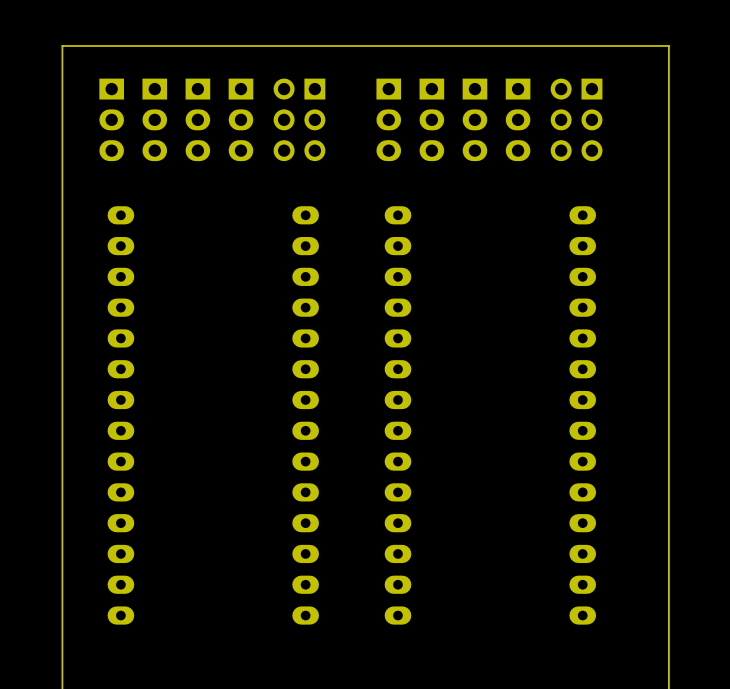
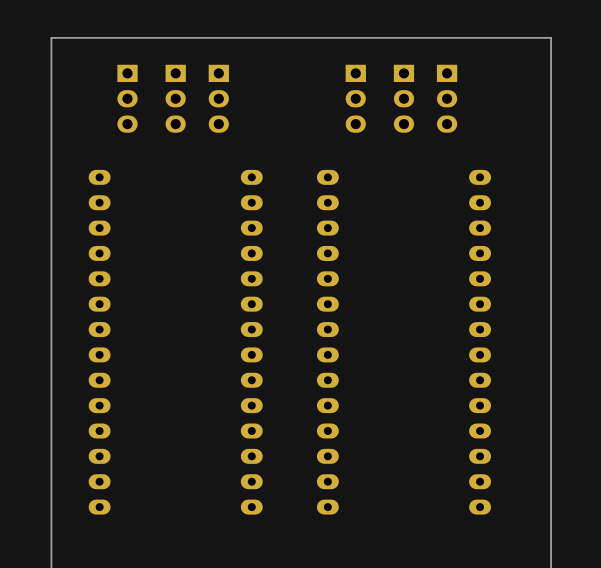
part: (111, 119) -> none
part: (197, 119) -> none
part: none -> (175, 98)
part: (240, 119) -> none
part: none -> (218, 98)
part: (299, 119) -> none
part: (388, 119) -> none
part: (474, 119) -> none
part: none -> (403, 98)
part: (518, 119) -> none
part: none -> (447, 98)
part: (576, 119) -> none

